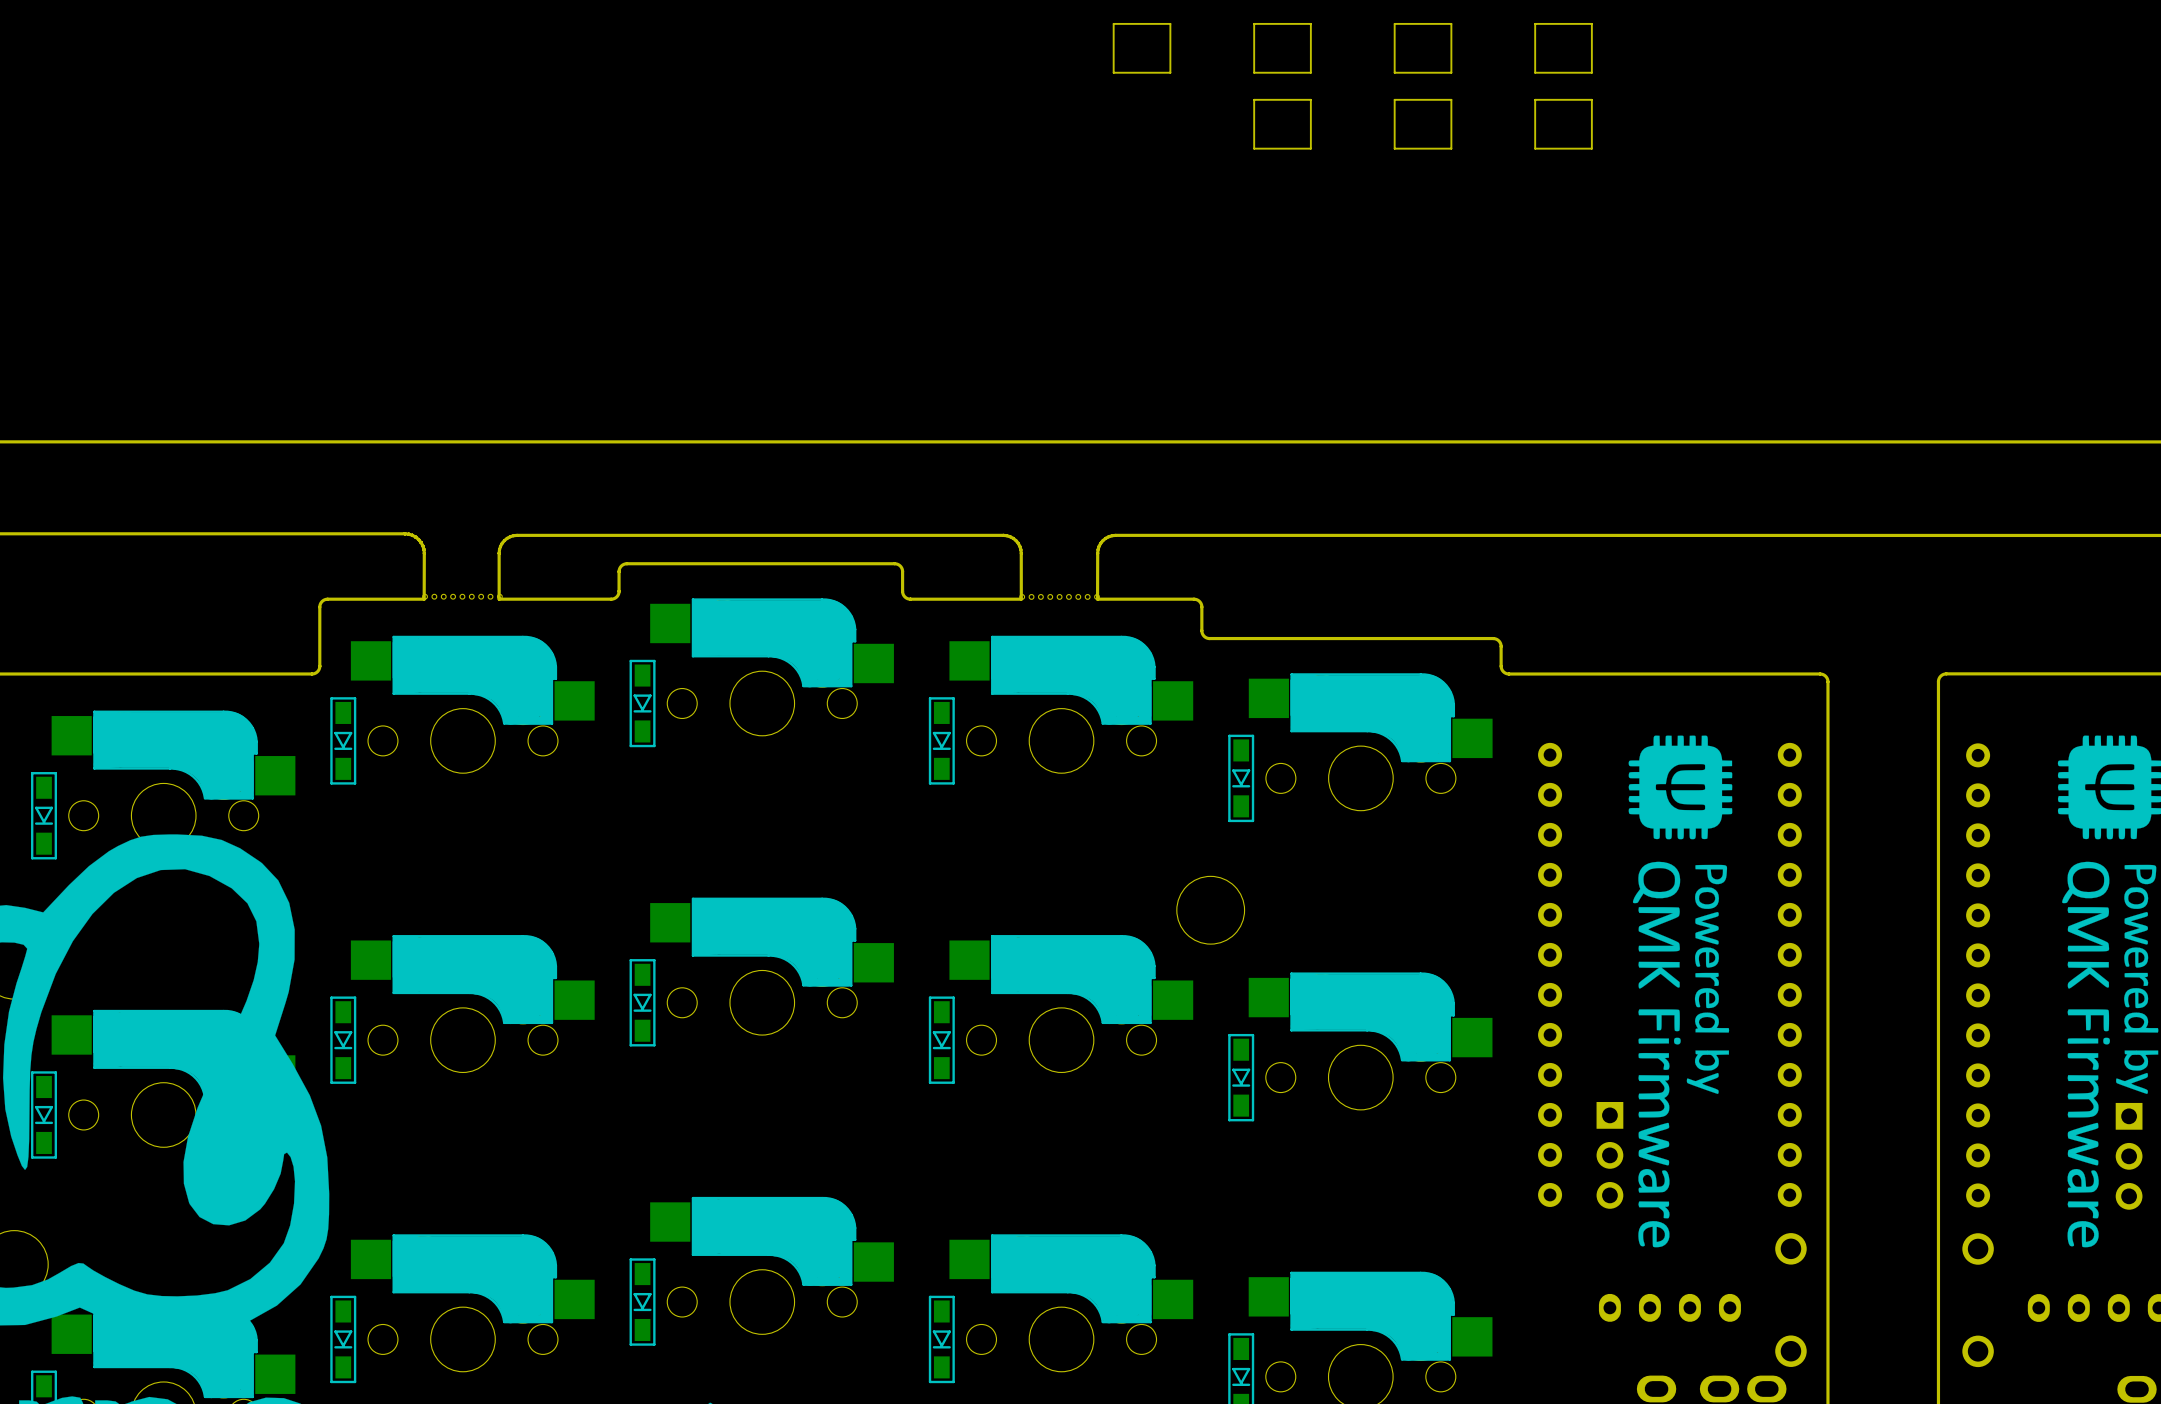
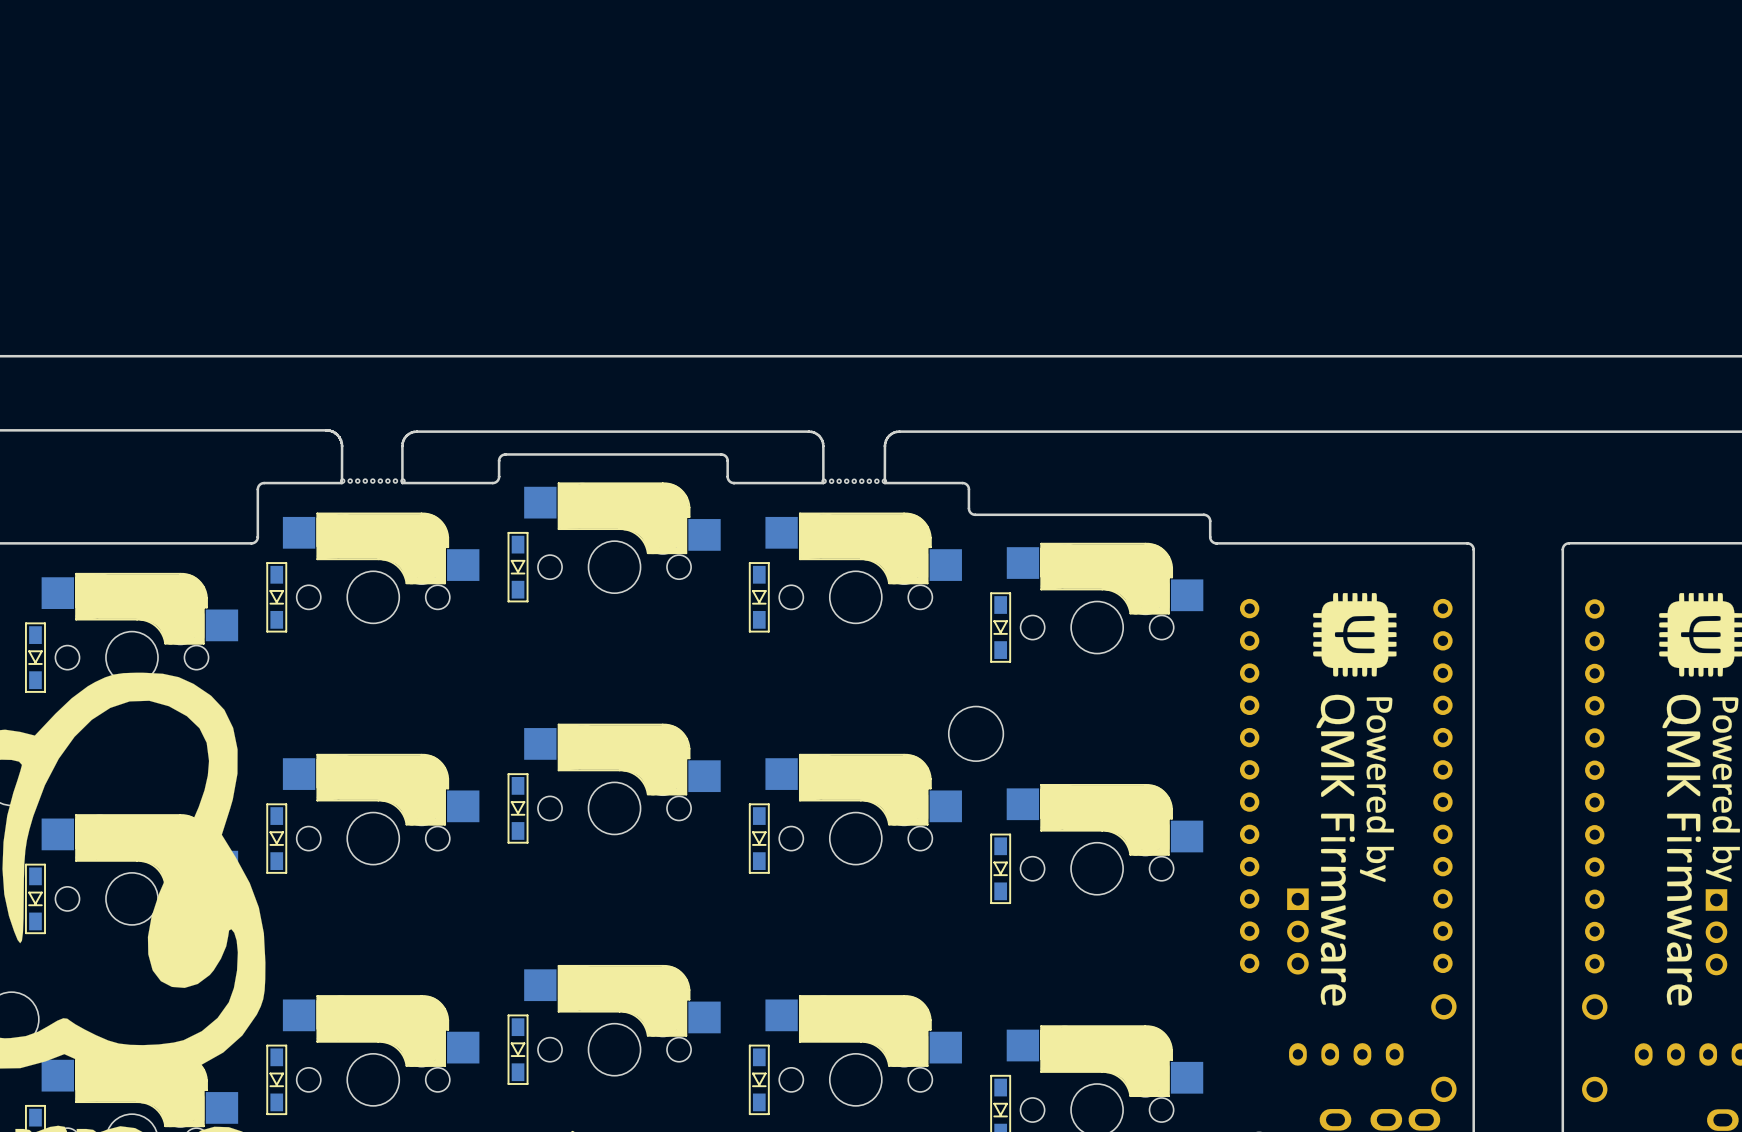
part: (1142, 48) -> none
part: (1282, 48) -> none
part: (1423, 48) -> none
part: (1563, 48) -> none
part: (1282, 124) -> none
part: (1423, 124) -> none
part: (1563, 124) -> none

